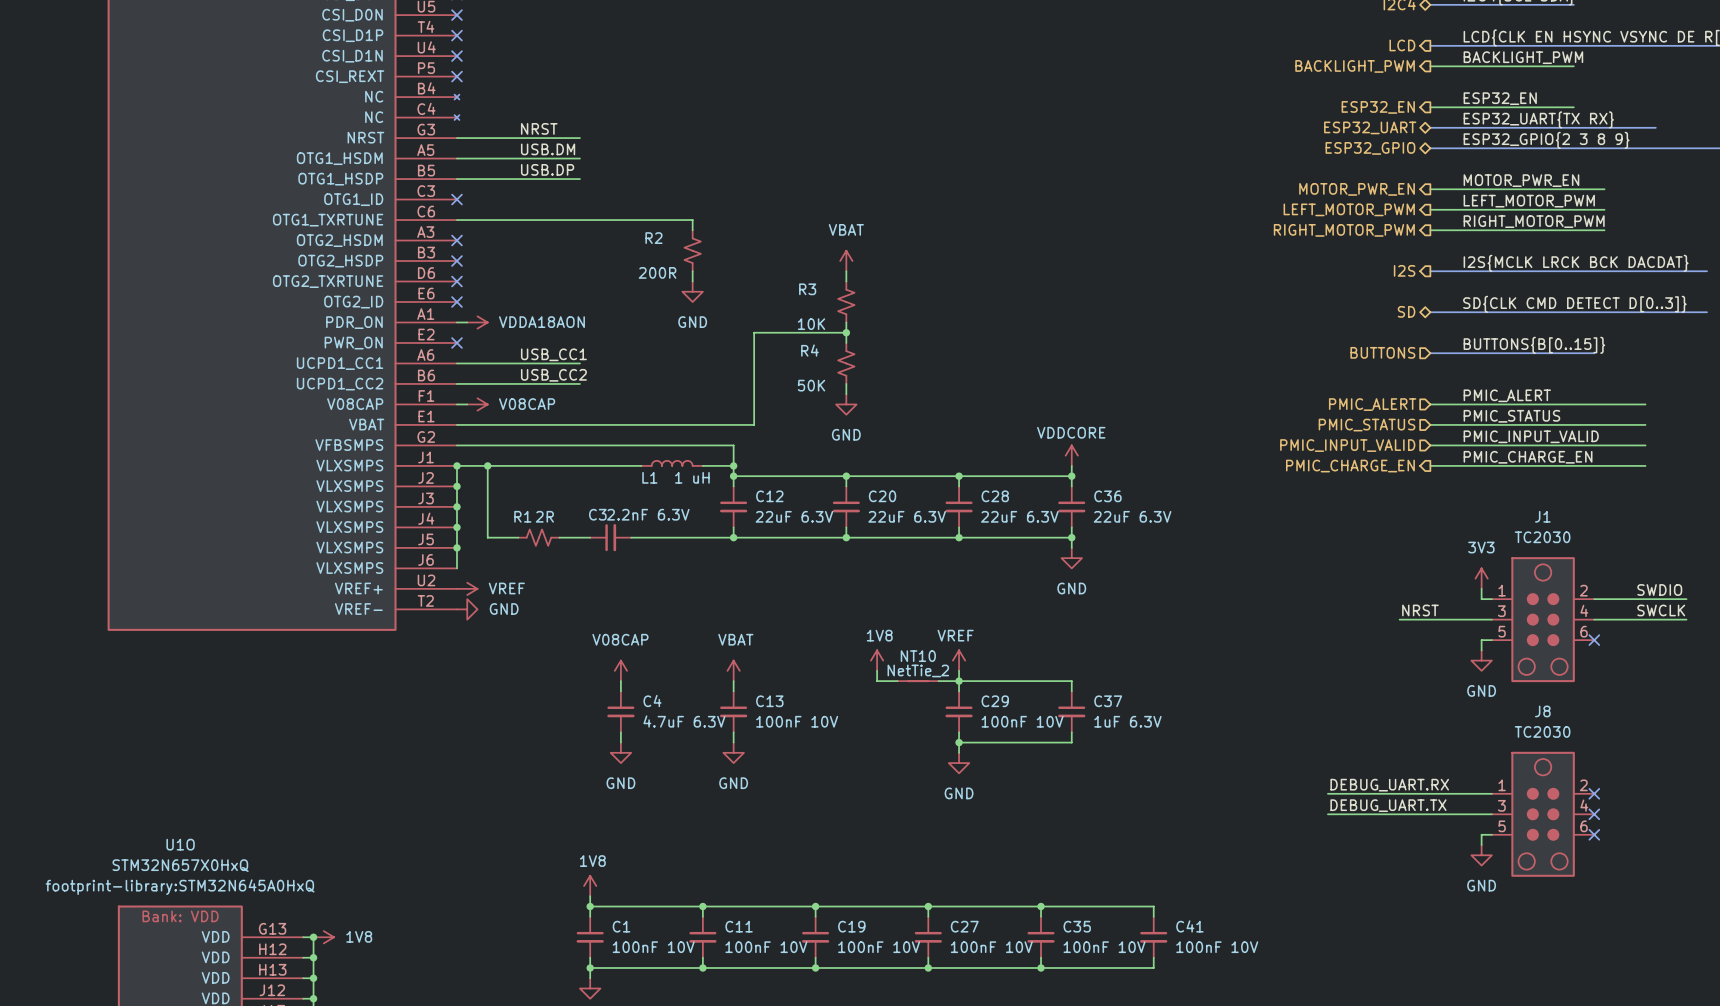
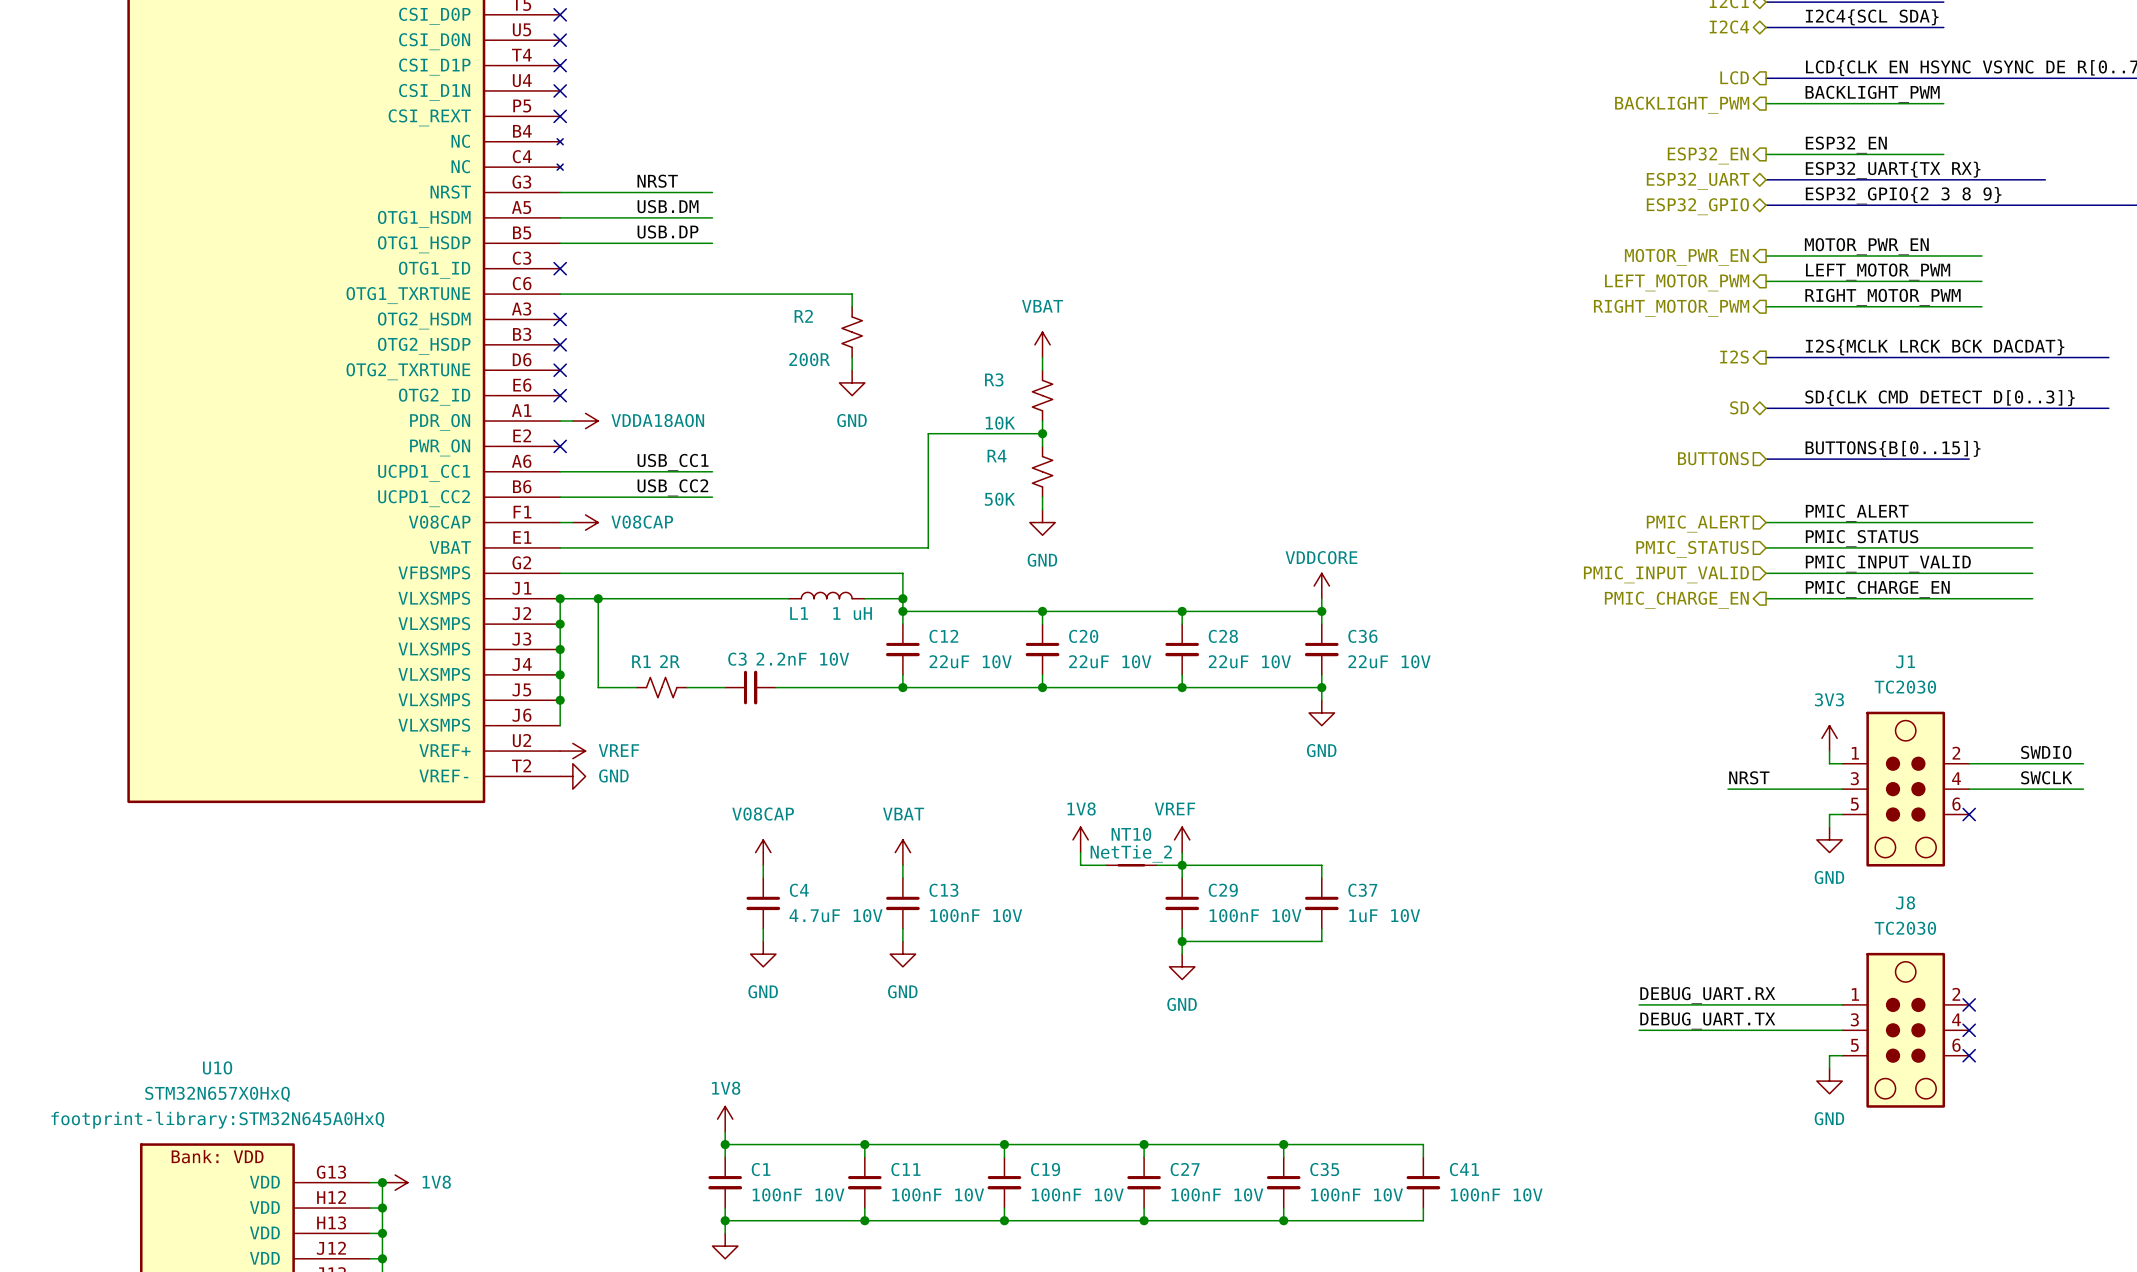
C3 value: 2.2nF 6.3V (648, 514) -> 2.2nF 10V (802, 659)
C12 value: 22uF 6.3V (794, 516) -> 22uF 10V (970, 661)
C20 value: 22uF 6.3V (907, 516) -> 22uF 10V (1110, 661)
C28 value: 22uF 6.3V (1019, 516) -> 22uF 10V (1249, 661)
C36 value: 22uF 6.3V (1132, 516) -> 22uF 10V (1389, 661)
C4 value: 4.7uF 6.3V (684, 721) -> 4.7uF 10V (836, 915)
C37 value: 1uF 6.3V (1127, 721) -> 1uF 10V (1384, 915)

